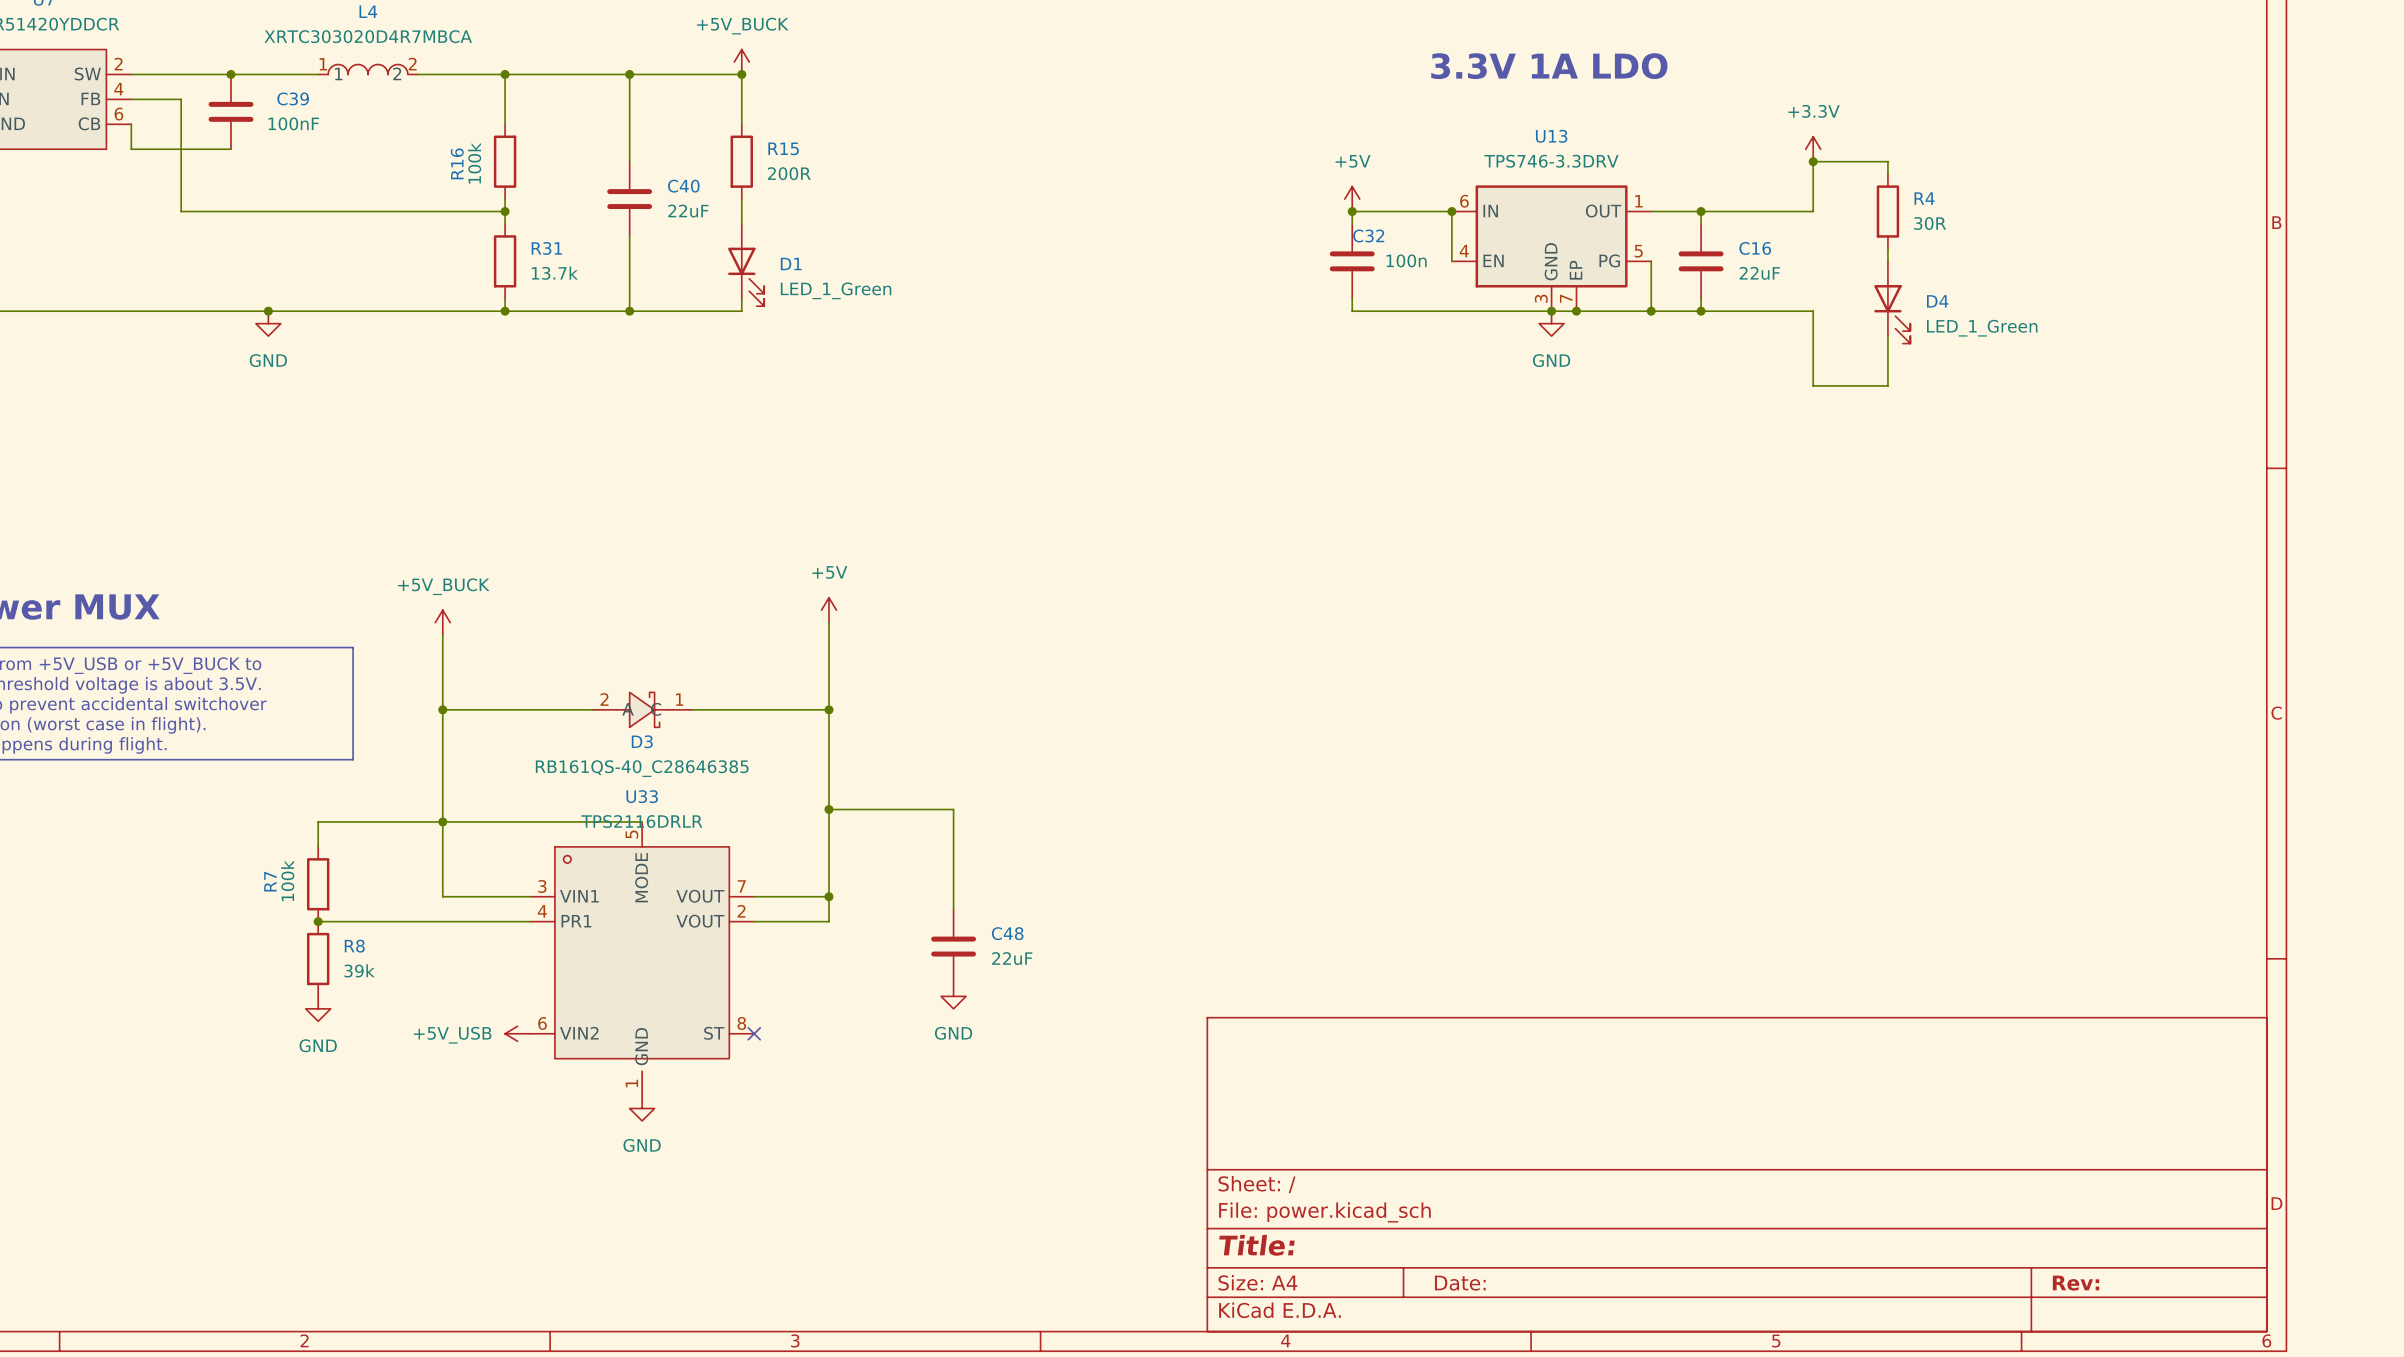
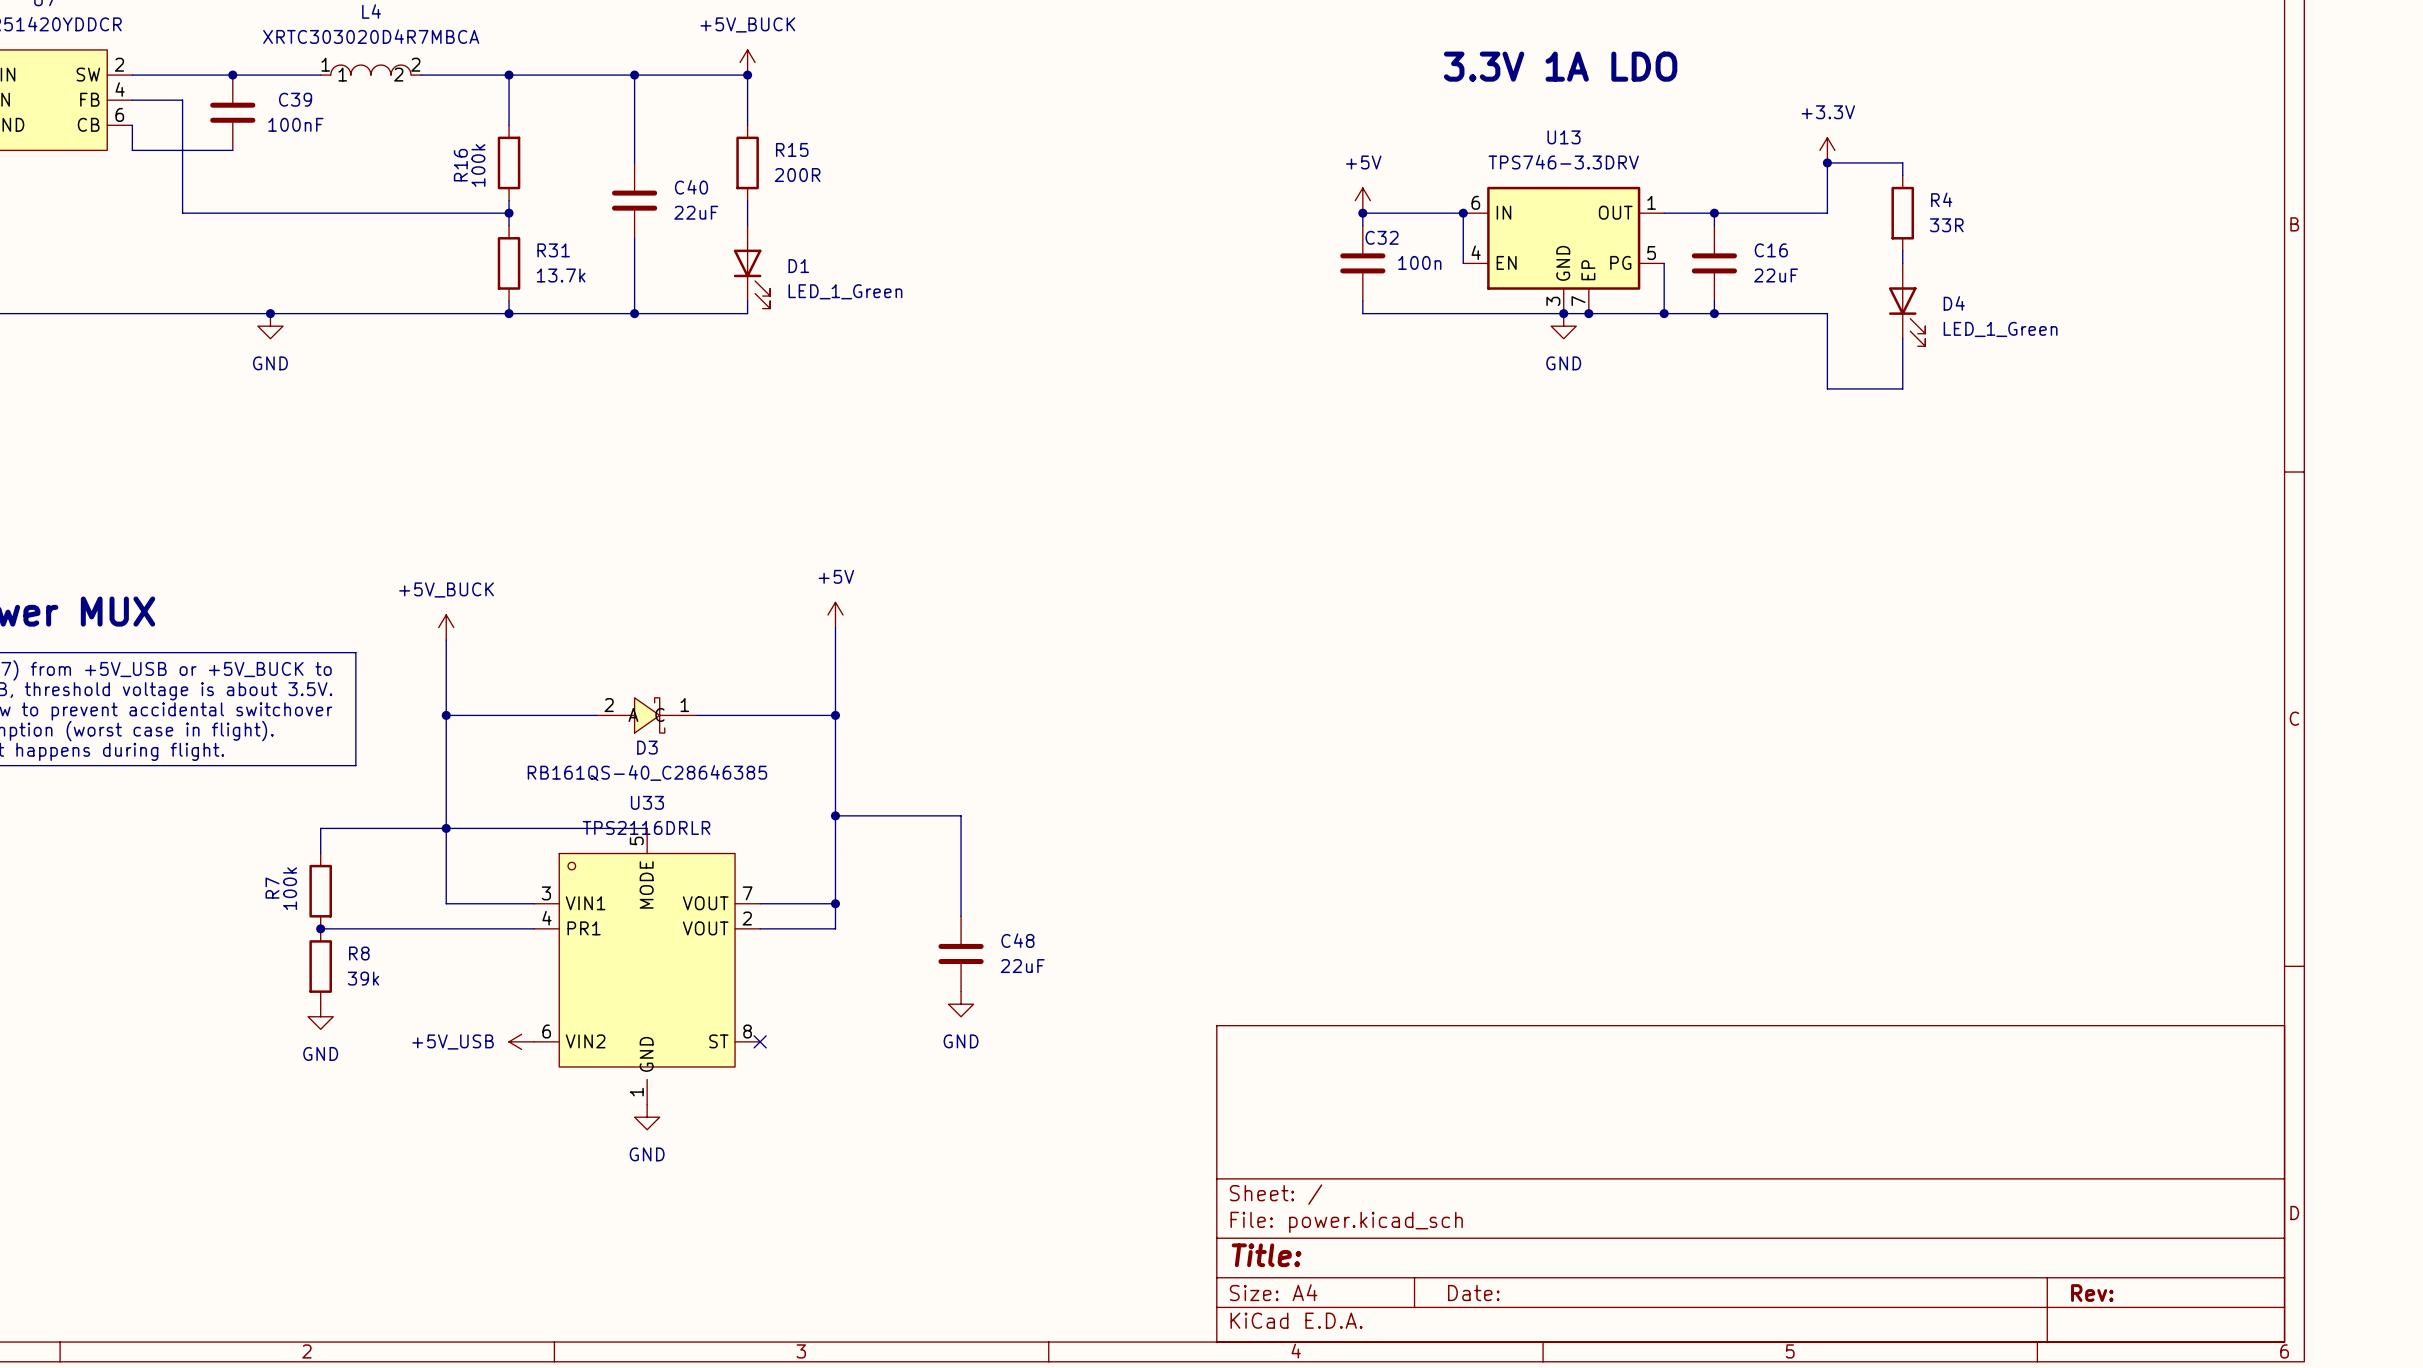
R4 value: 30R (1930, 223) -> 33R (1946, 225)

